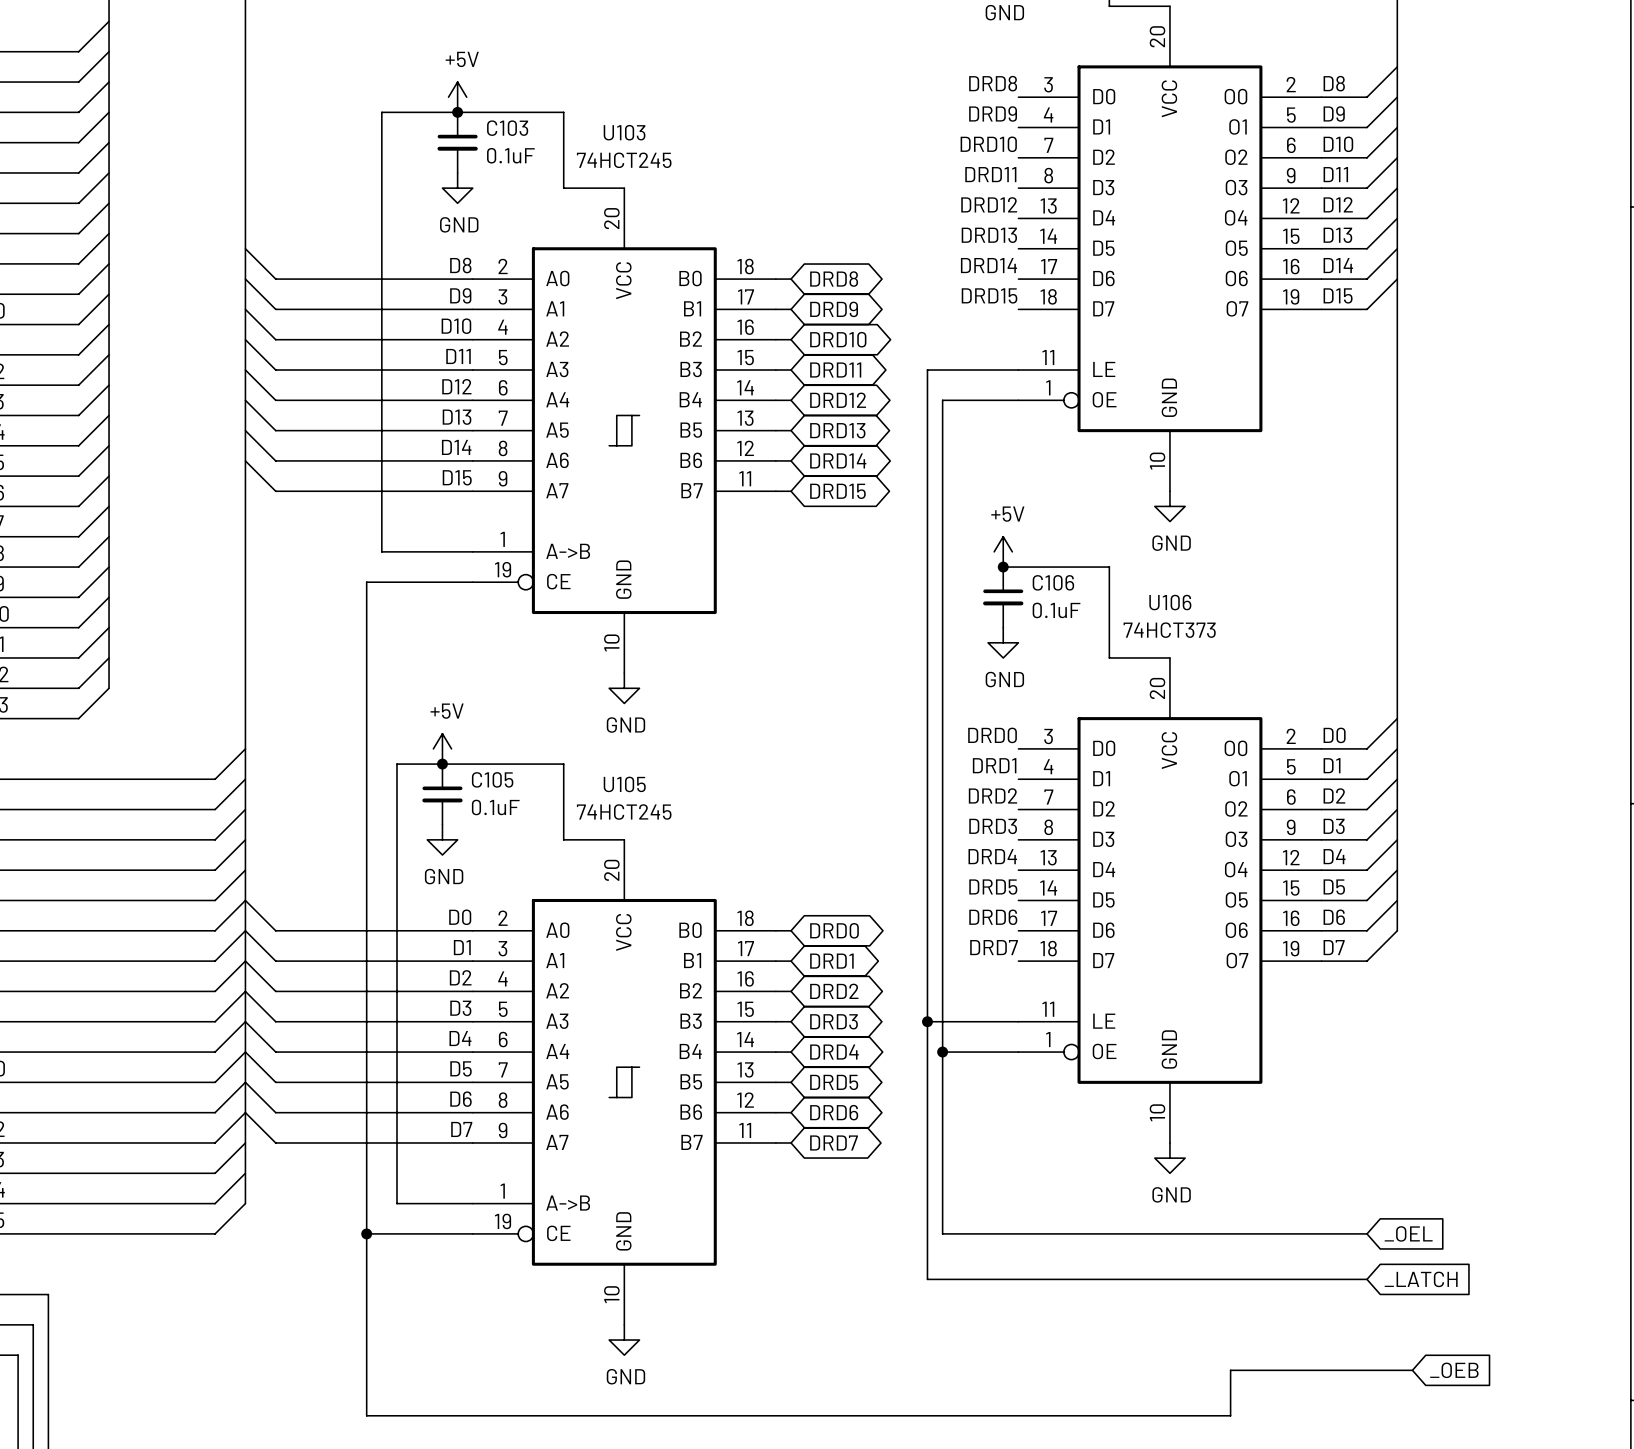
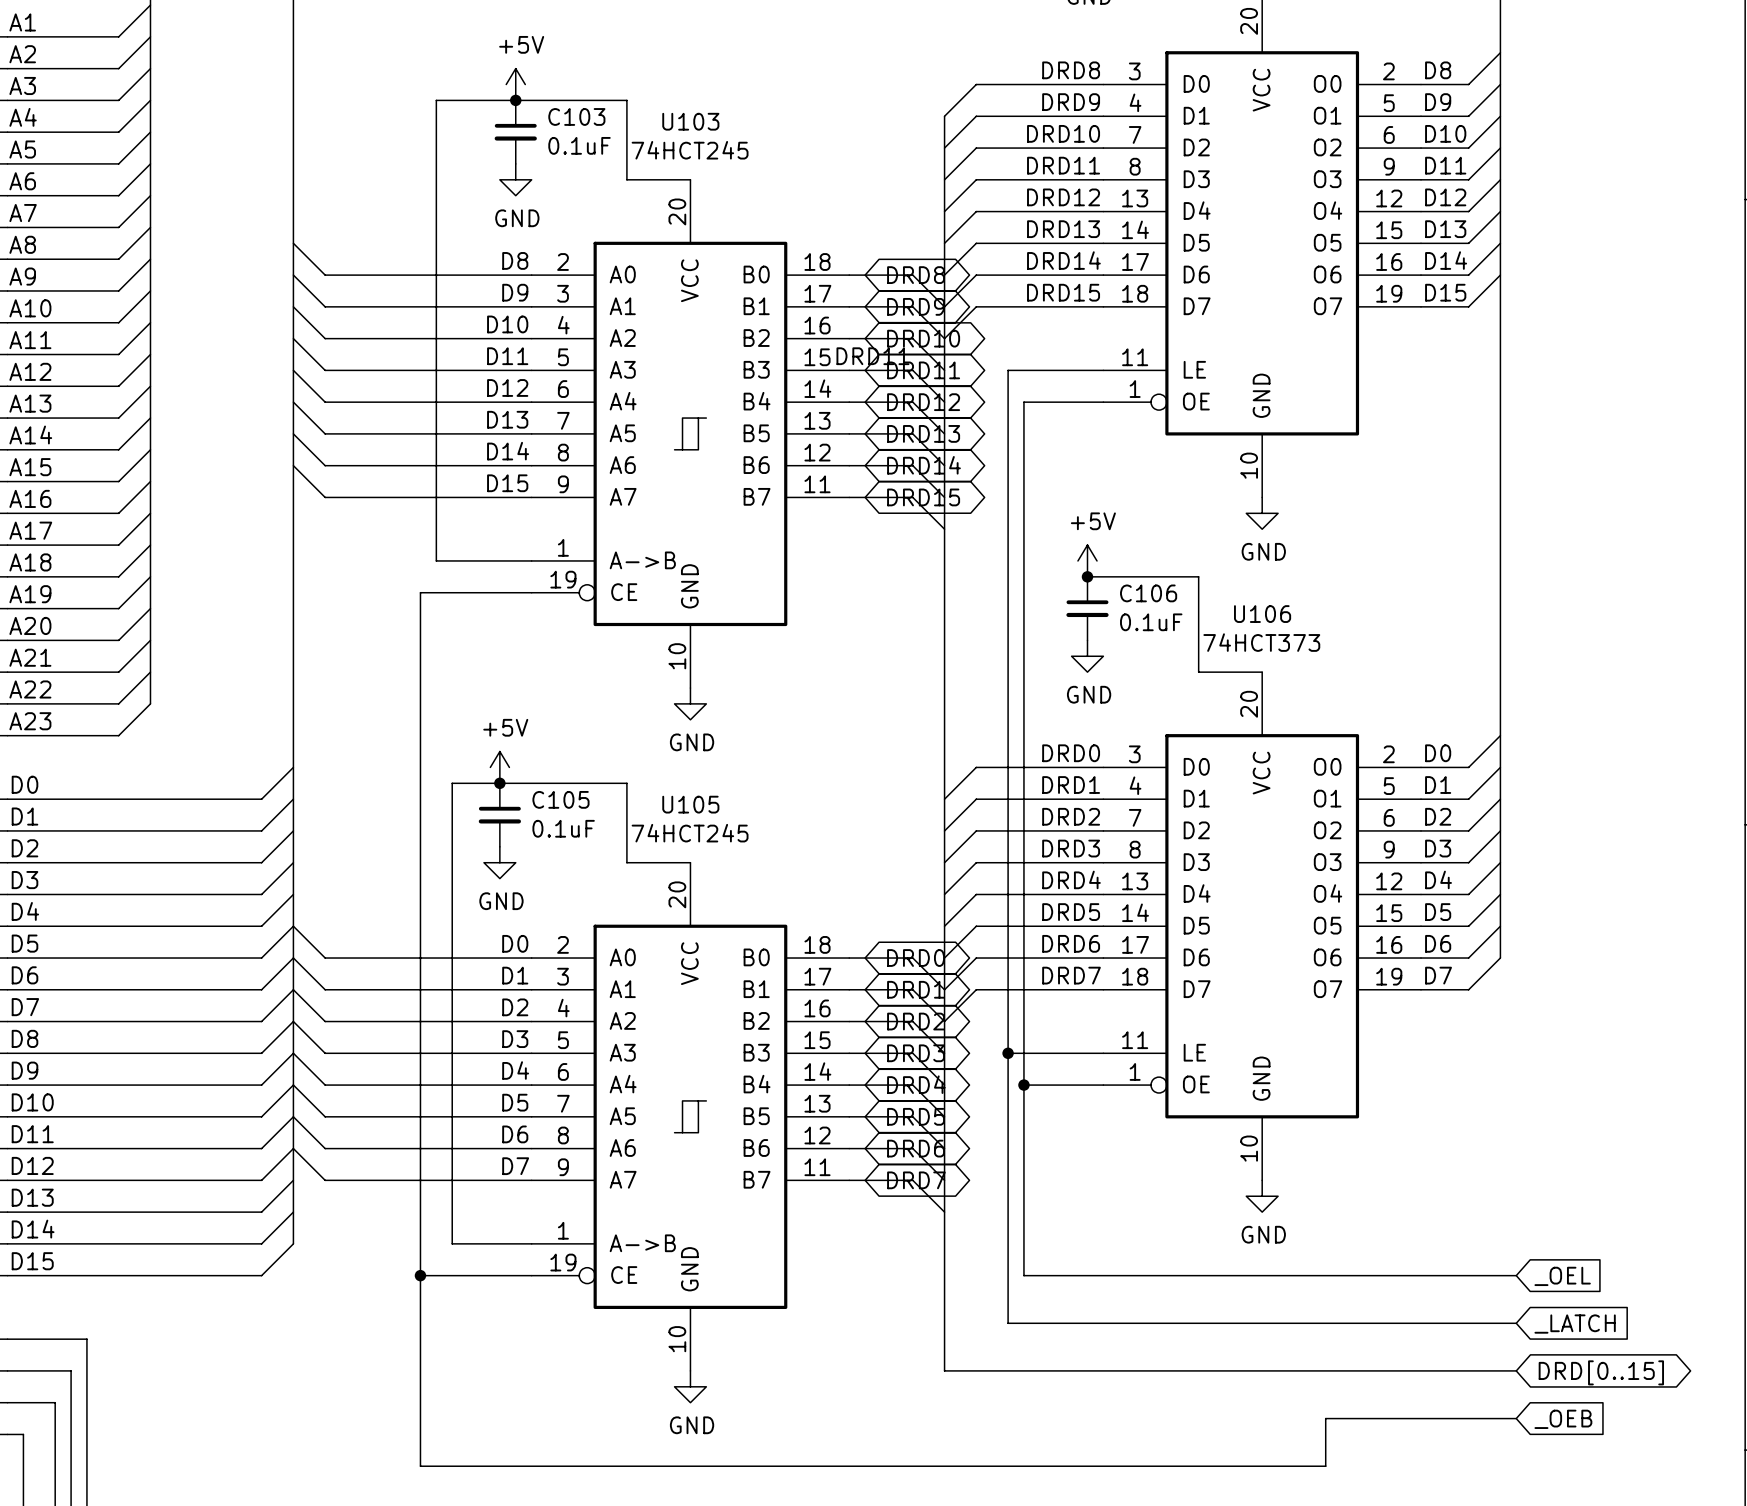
wire: none -> (1103, 84) (976, 84) (944, 116)
bus: none -> (944, 116) (944, 1370) (1516, 1370)
wire: none -> (1103, 116) (976, 116) (944, 148)
wire: none -> (1103, 148) (976, 148) (944, 179)
wire: none -> (1103, 179) (976, 179) (944, 211)
wire: none -> (1103, 211) (976, 211) (944, 243)
wire: none -> (1103, 243) (976, 243) (944, 275)
wire: none -> (865, 275) (912, 275) (944, 306) (976, 275) (1103, 275)
wire: none -> (865, 306) (912, 306) (944, 338) (976, 306) (1103, 306)
wire: none -> (865, 338) (912, 338) (944, 370)
label: none -> DRD11 (872, 356)
wire: none -> (865, 370) (912, 370) (944, 402)
wire: none -> (865, 402) (912, 402) (944, 433)
wire: none -> (865, 433) (912, 433) (944, 465)
wire: none -> (865, 465) (912, 465) (944, 497)
wire: none -> (865, 497) (912, 497) (944, 529)
wire: none -> (1103, 767) (976, 767) (944, 799)
wire: none -> (1103, 799) (976, 799) (944, 830)
wire: none -> (1103, 830) (976, 830) (944, 862)
wire: none -> (1103, 862) (976, 862) (944, 894)
wire: none -> (1103, 894) (976, 894) (944, 926)
wire: none -> (1103, 926) (976, 926) (944, 958)
wire: none -> (865, 958) (912, 958) (944, 989) (976, 958) (1103, 958)
wire: none -> (865, 989) (912, 989) (944, 1021) (976, 989) (1103, 989)
wire: none -> (865, 1021) (912, 1021) (944, 1053)
wire: none -> (865, 1053) (912, 1053) (944, 1085)
wire: none -> (865, 1085) (912, 1085) (944, 1116)
wire: none -> (865, 1116) (912, 1116) (944, 1148)
wire: none -> (865, 1148) (912, 1148) (944, 1180)
wire: none -> (865, 1180) (912, 1180) (944, 1212)
wire: none -> (1468, 1275) (1516, 1275)
global label position: _OEL (1408, 1233) -> _OEL (1562, 1276)
wire: none -> (1468, 1323) (1516, 1323)
global label position: _LATCH (1421, 1279) -> _LATCH (1575, 1324)
global label: none -> DRD[0..15] (1601, 1372)

